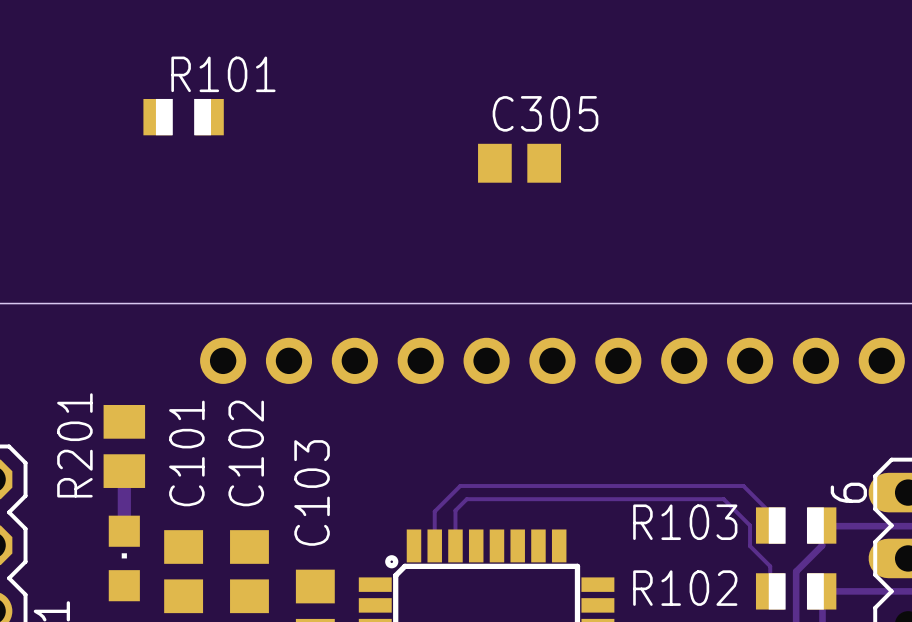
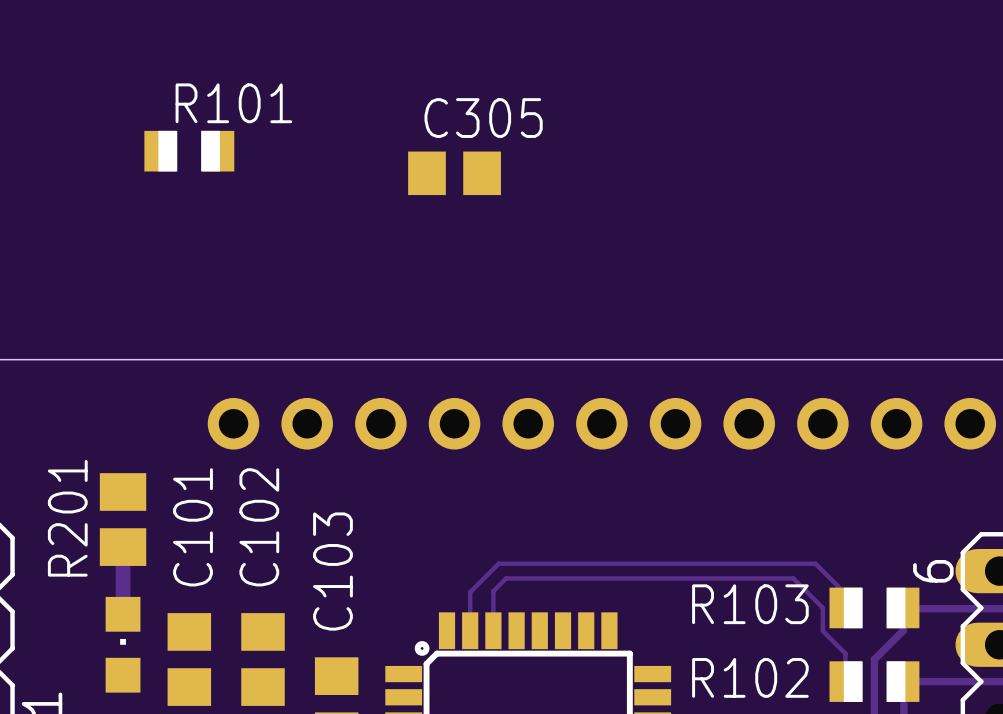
C305 position: (519, 163) -> (454, 173)

